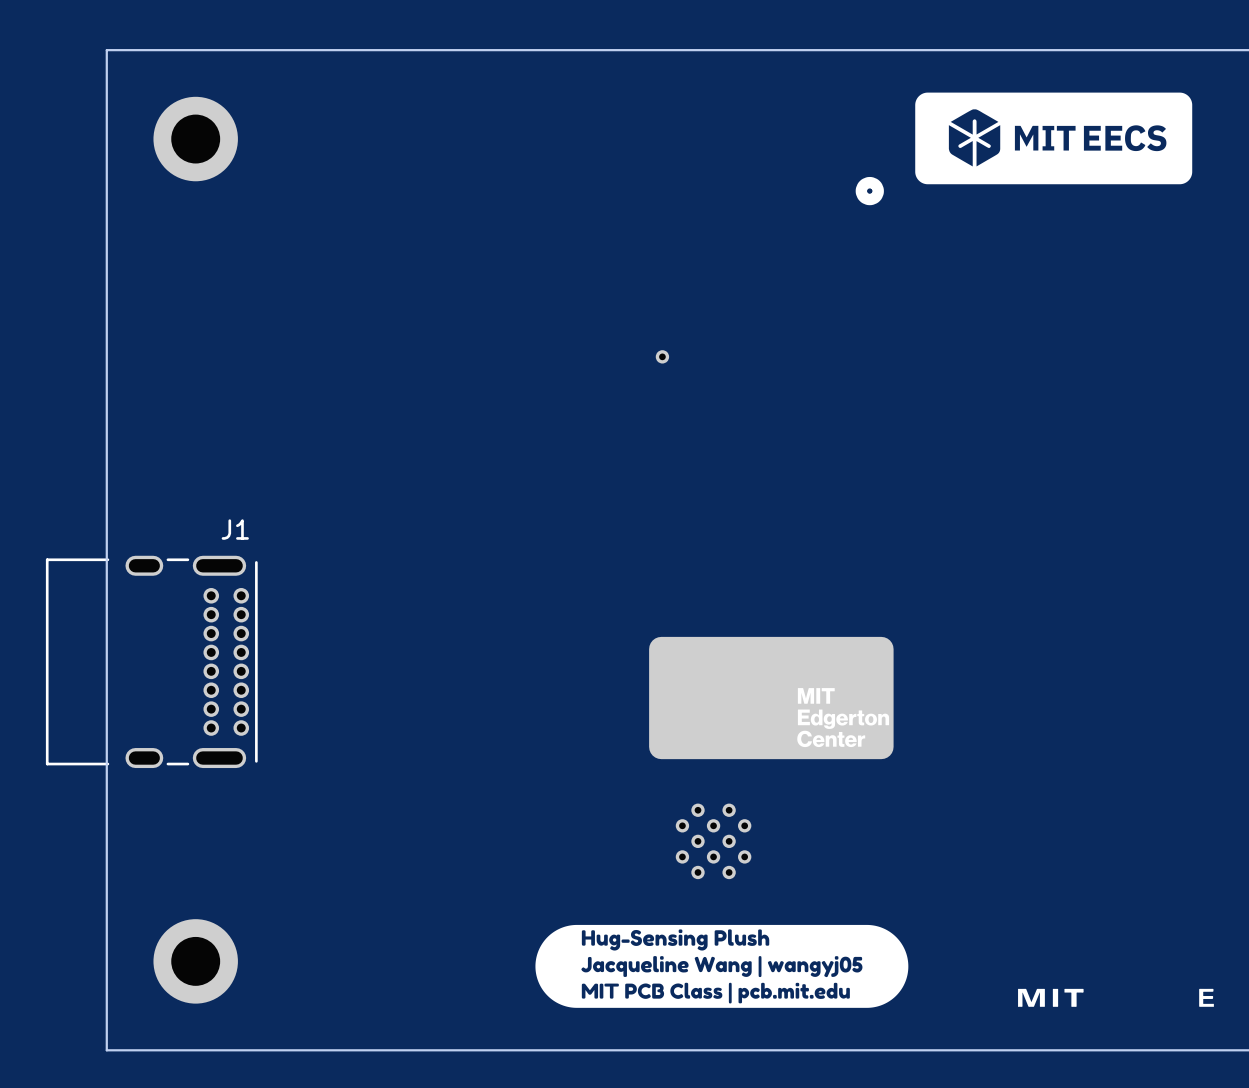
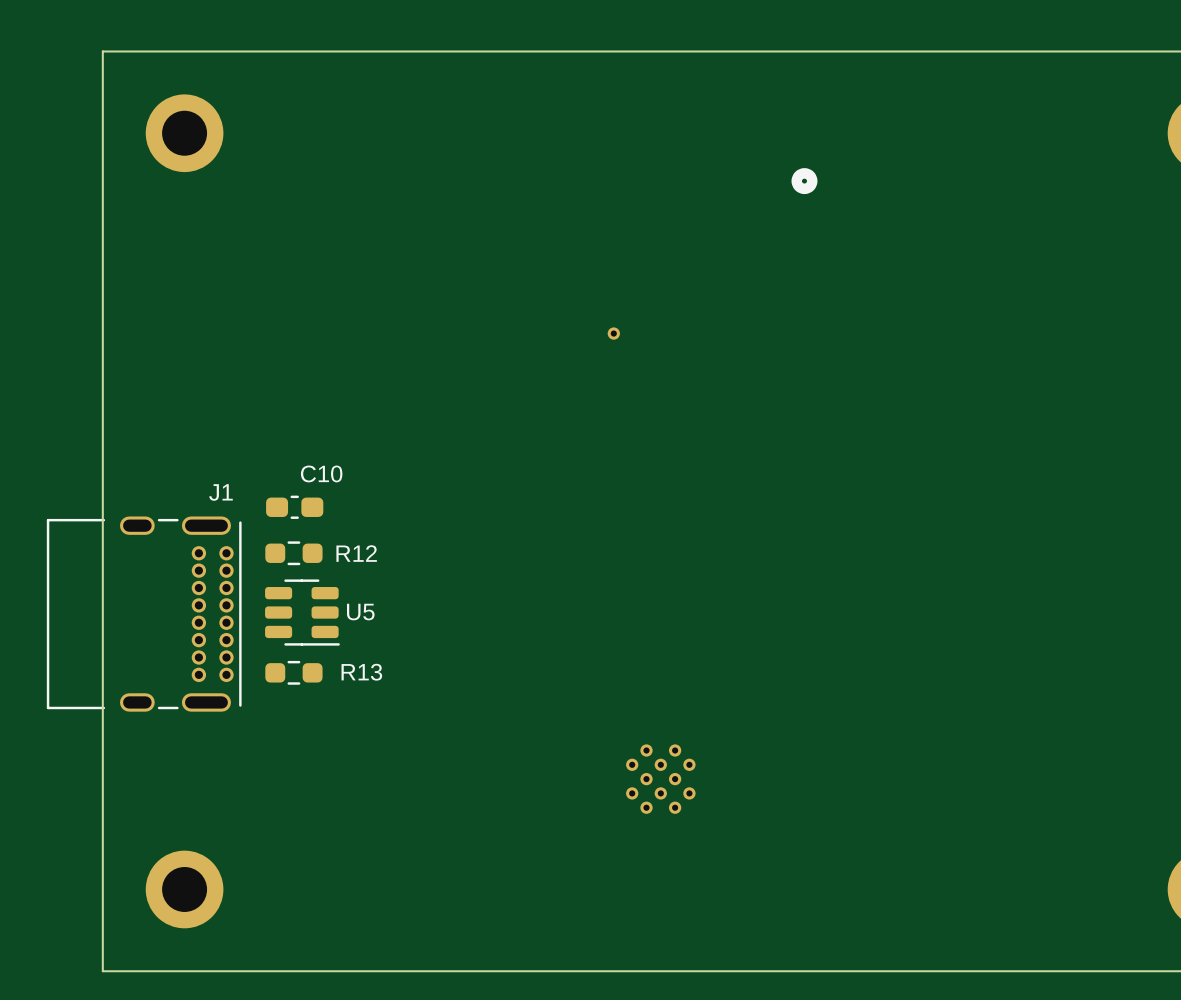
drawing: [915, 92, 1193, 185] -> none
C10: none -> (294, 507)
R12: none -> (293, 553)
U5: none -> (302, 612)
part: (771, 698) -> none
R13: none -> (293, 672)
drawing: [535, 924, 909, 1008] -> none
drawing: [1018, 988, 1214, 1007] -> none

